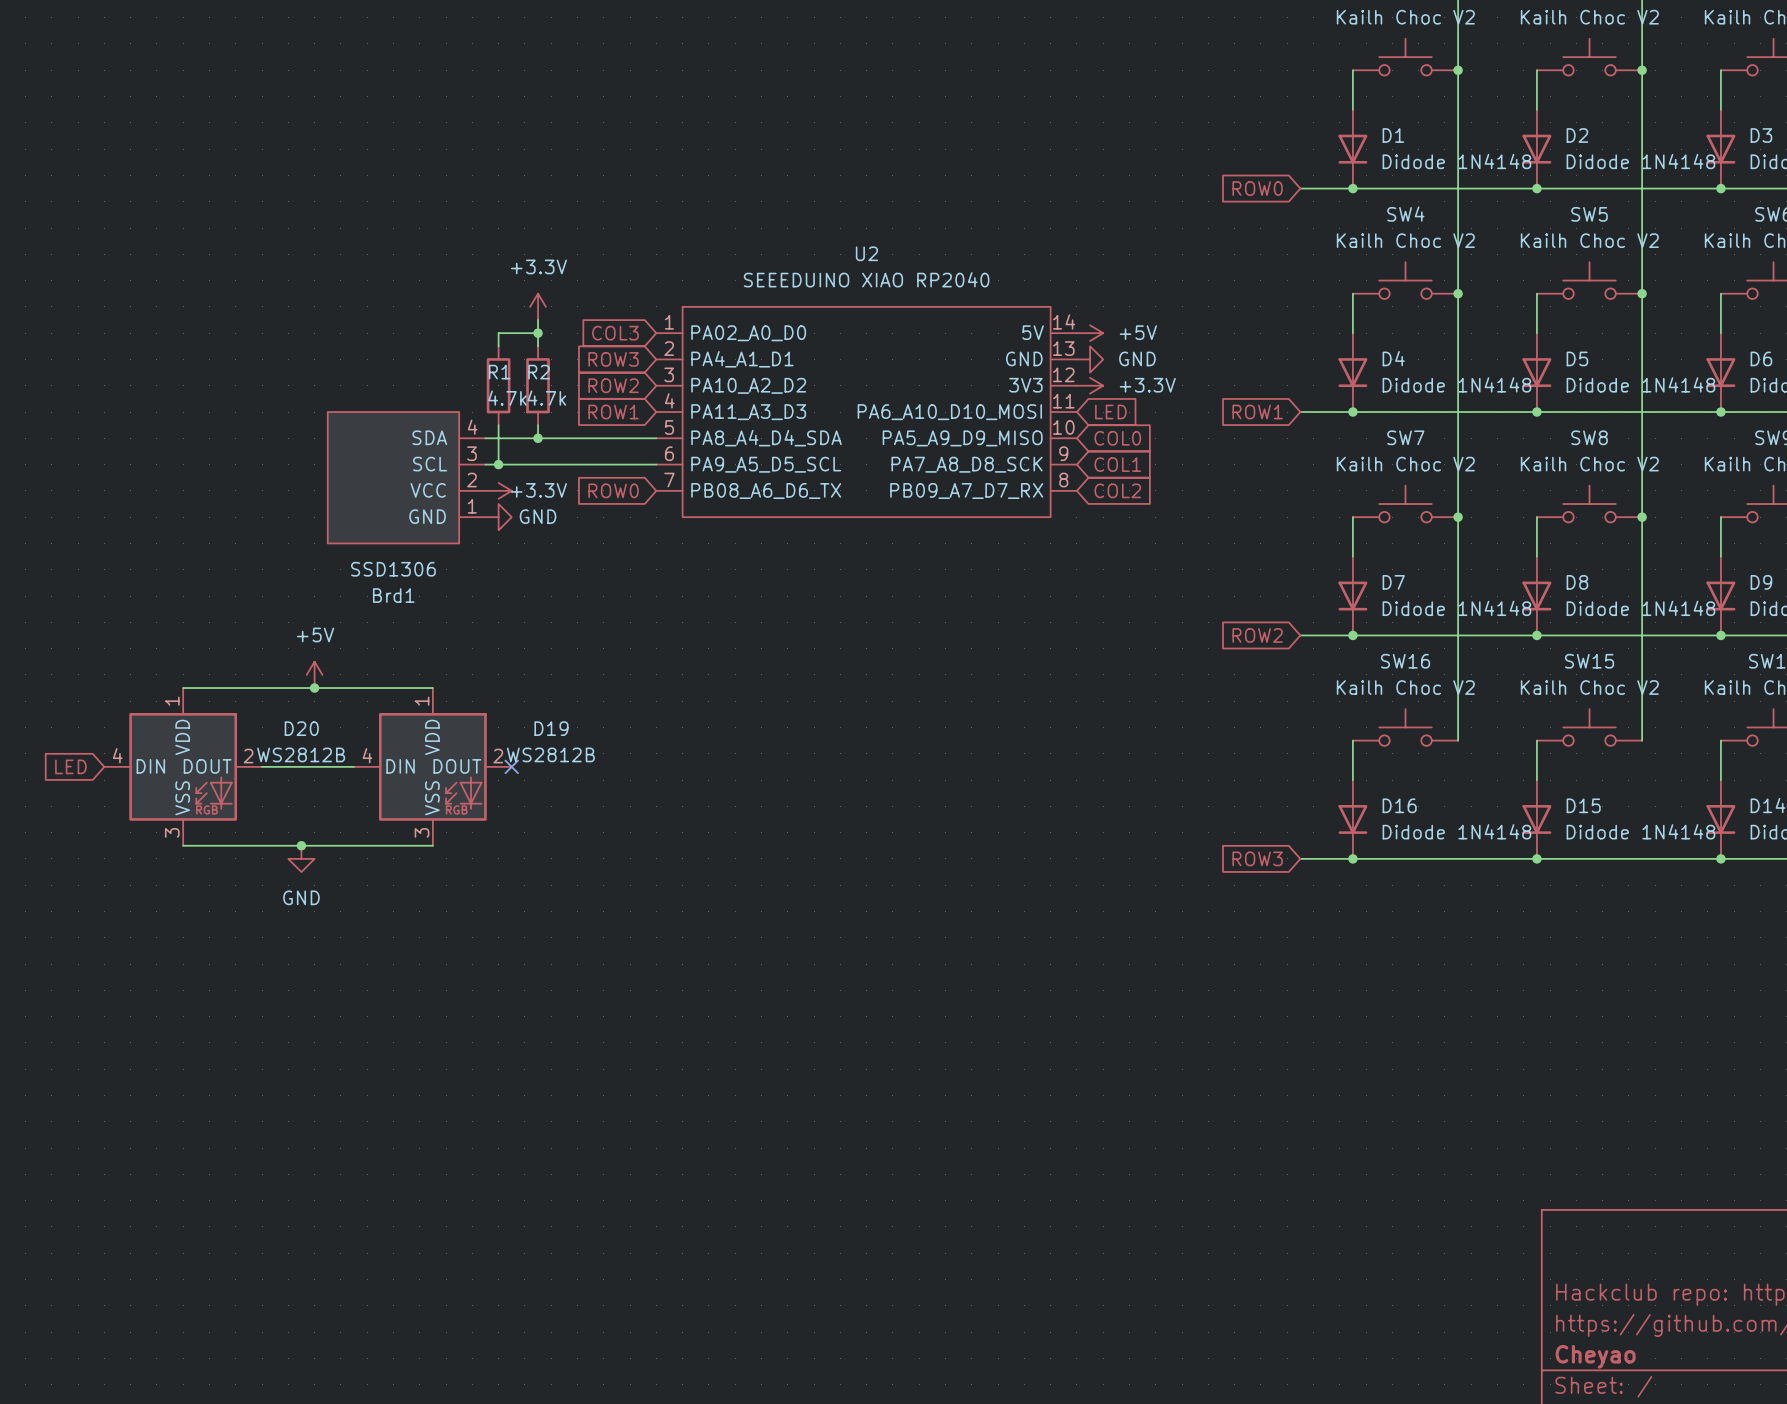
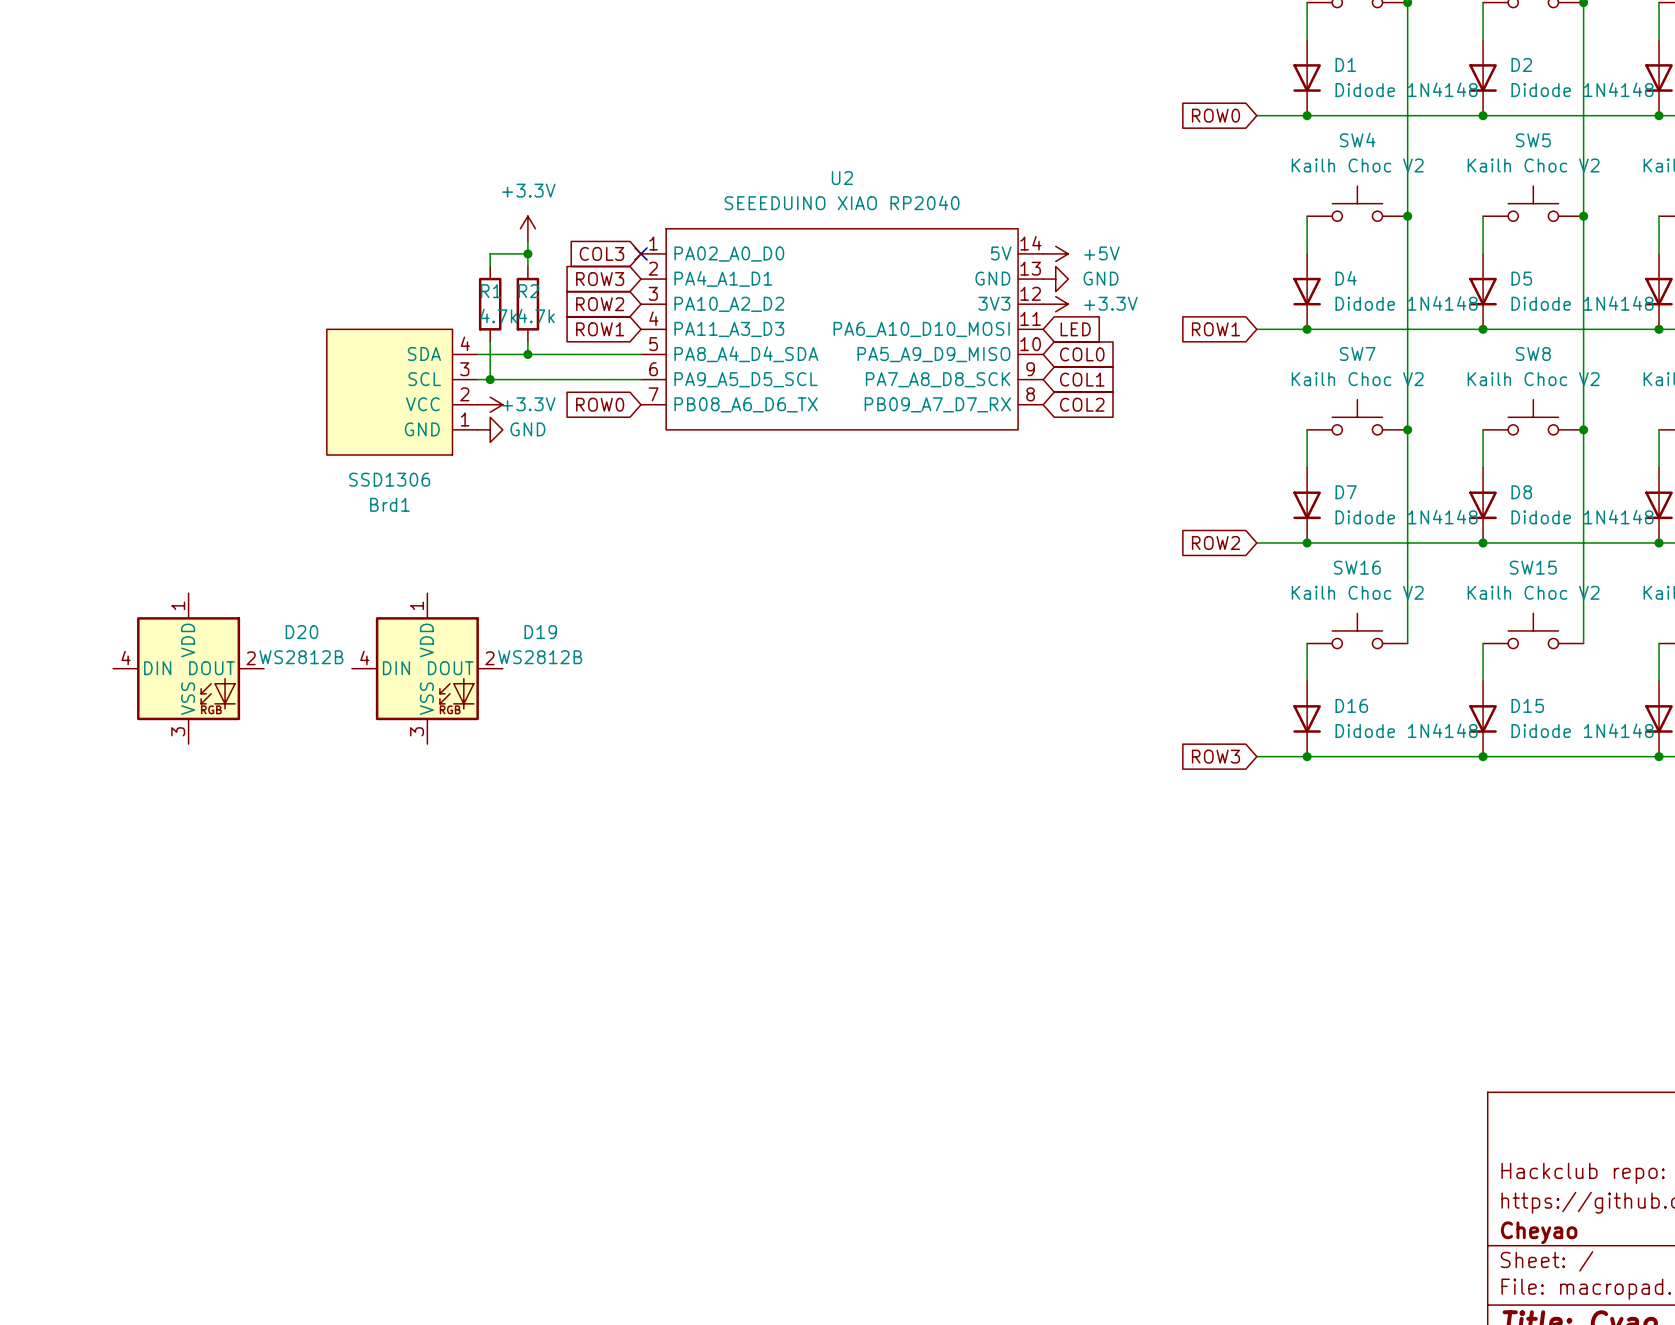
no-connect mark: none -> (641, 253)
power symbol: +5V (314, 674) -> none
wire: (183, 688) (432, 688) -> none
junction: (314, 688) -> none
global label: LED (70, 766) -> none
wire: (262, 766) (354, 766) -> none
no-connect mark: (511, 766) -> none
wire: (183, 845) (432, 845) -> none
junction: (301, 845) -> none
power symbol: GND (301, 858) -> none

